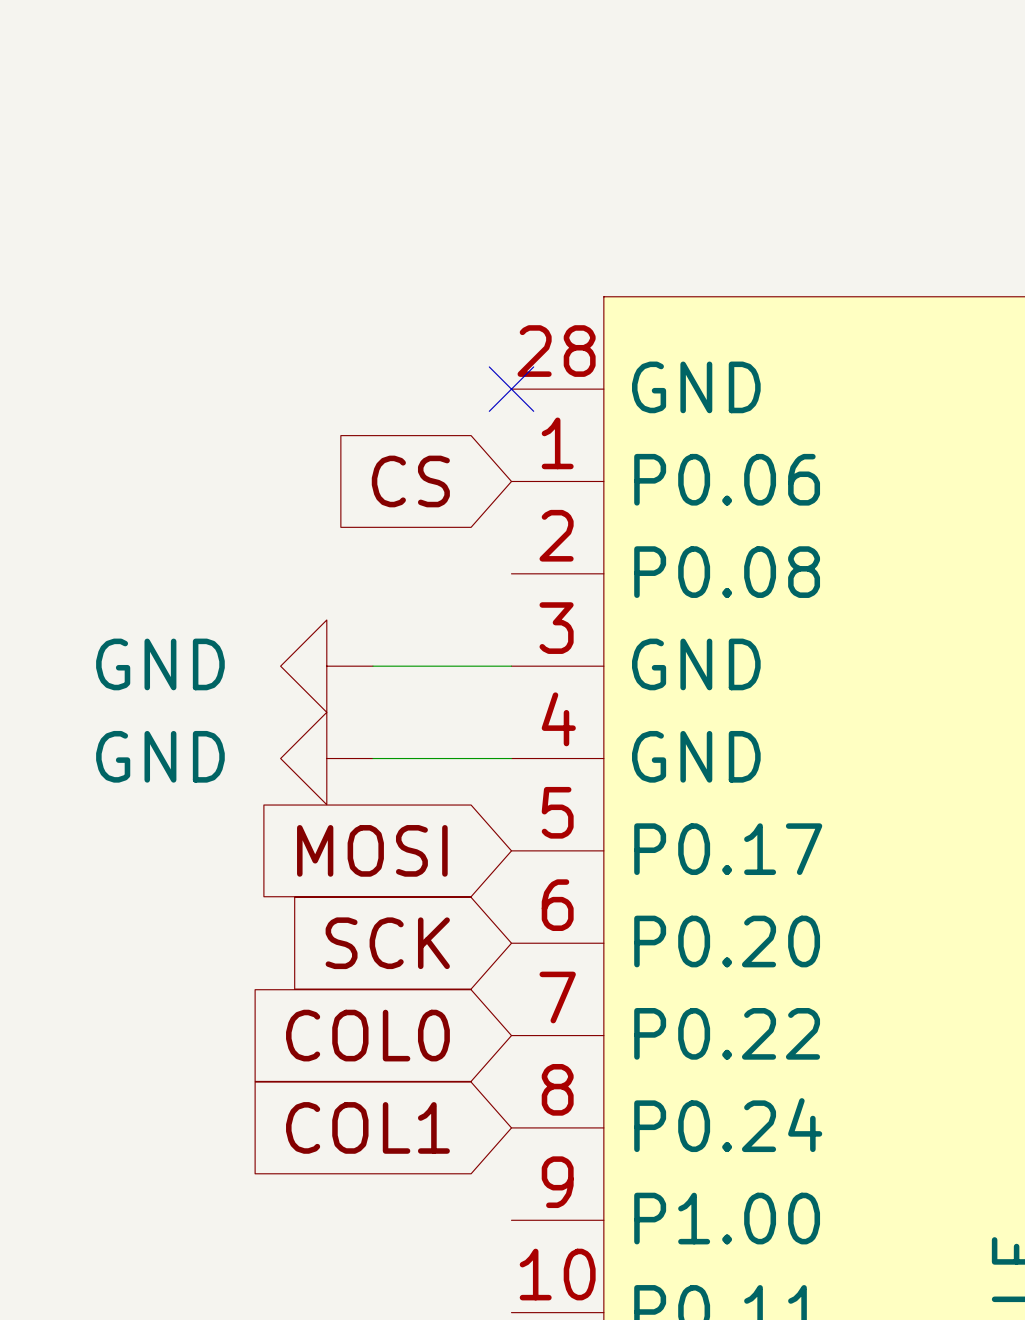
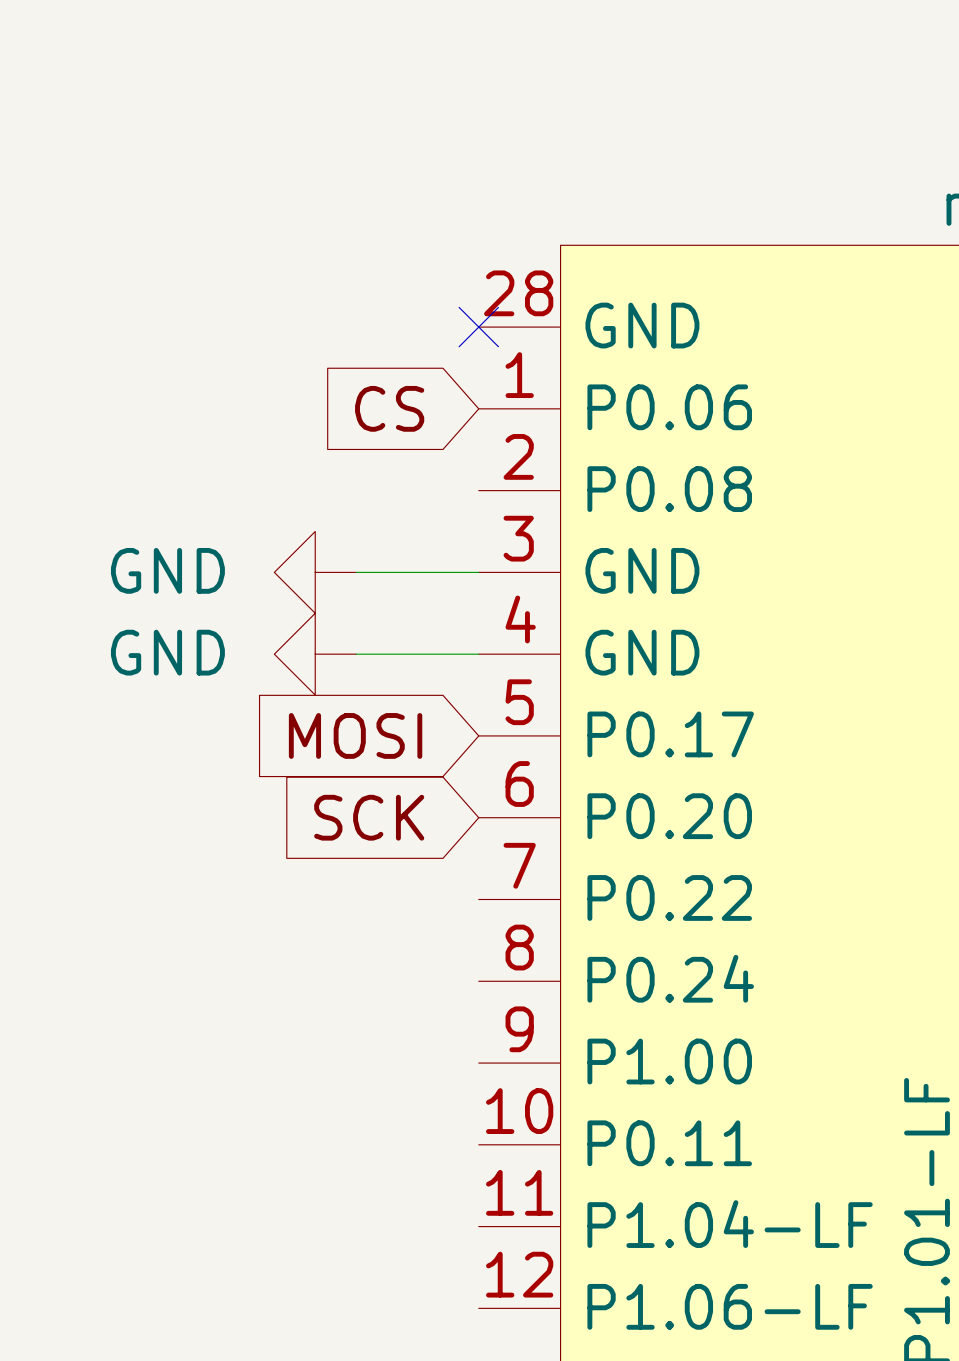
global label: COL0 (367, 1035) -> none
global label: COL1 (367, 1127) -> none

